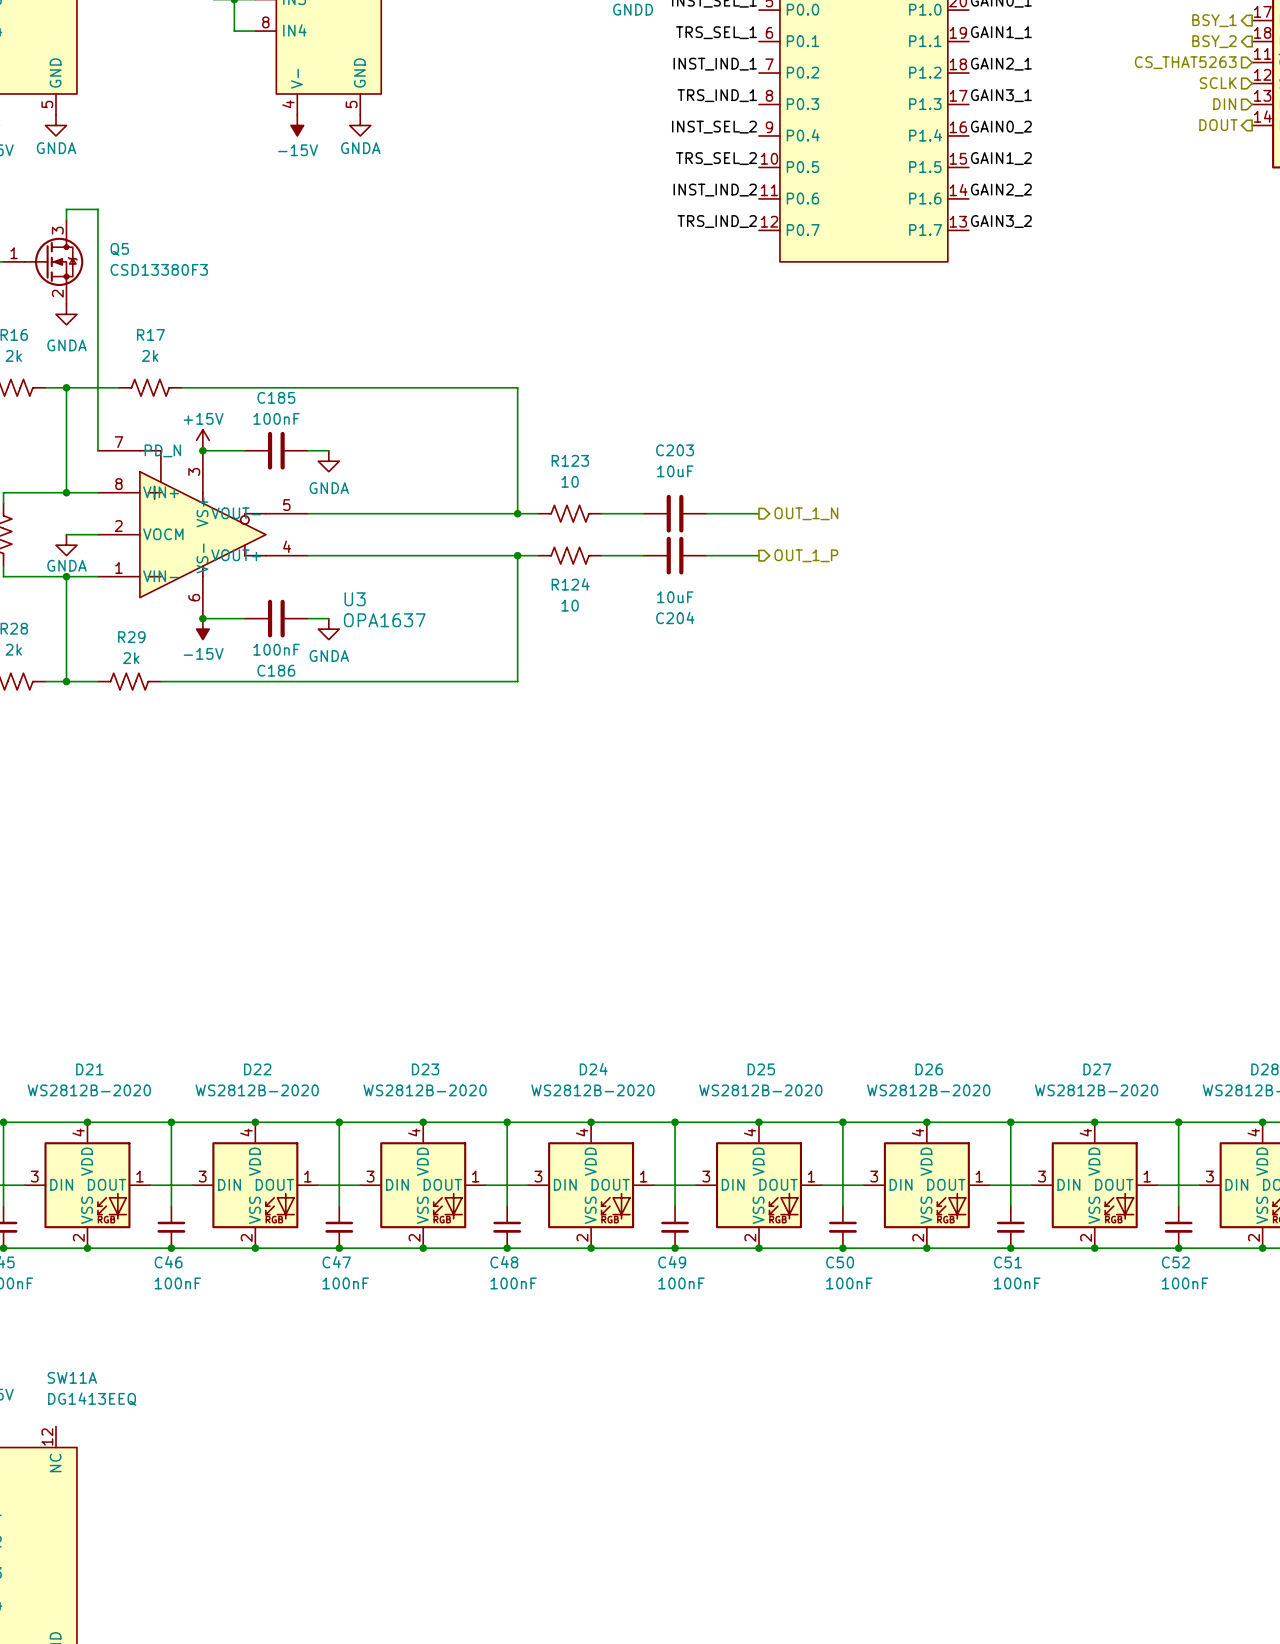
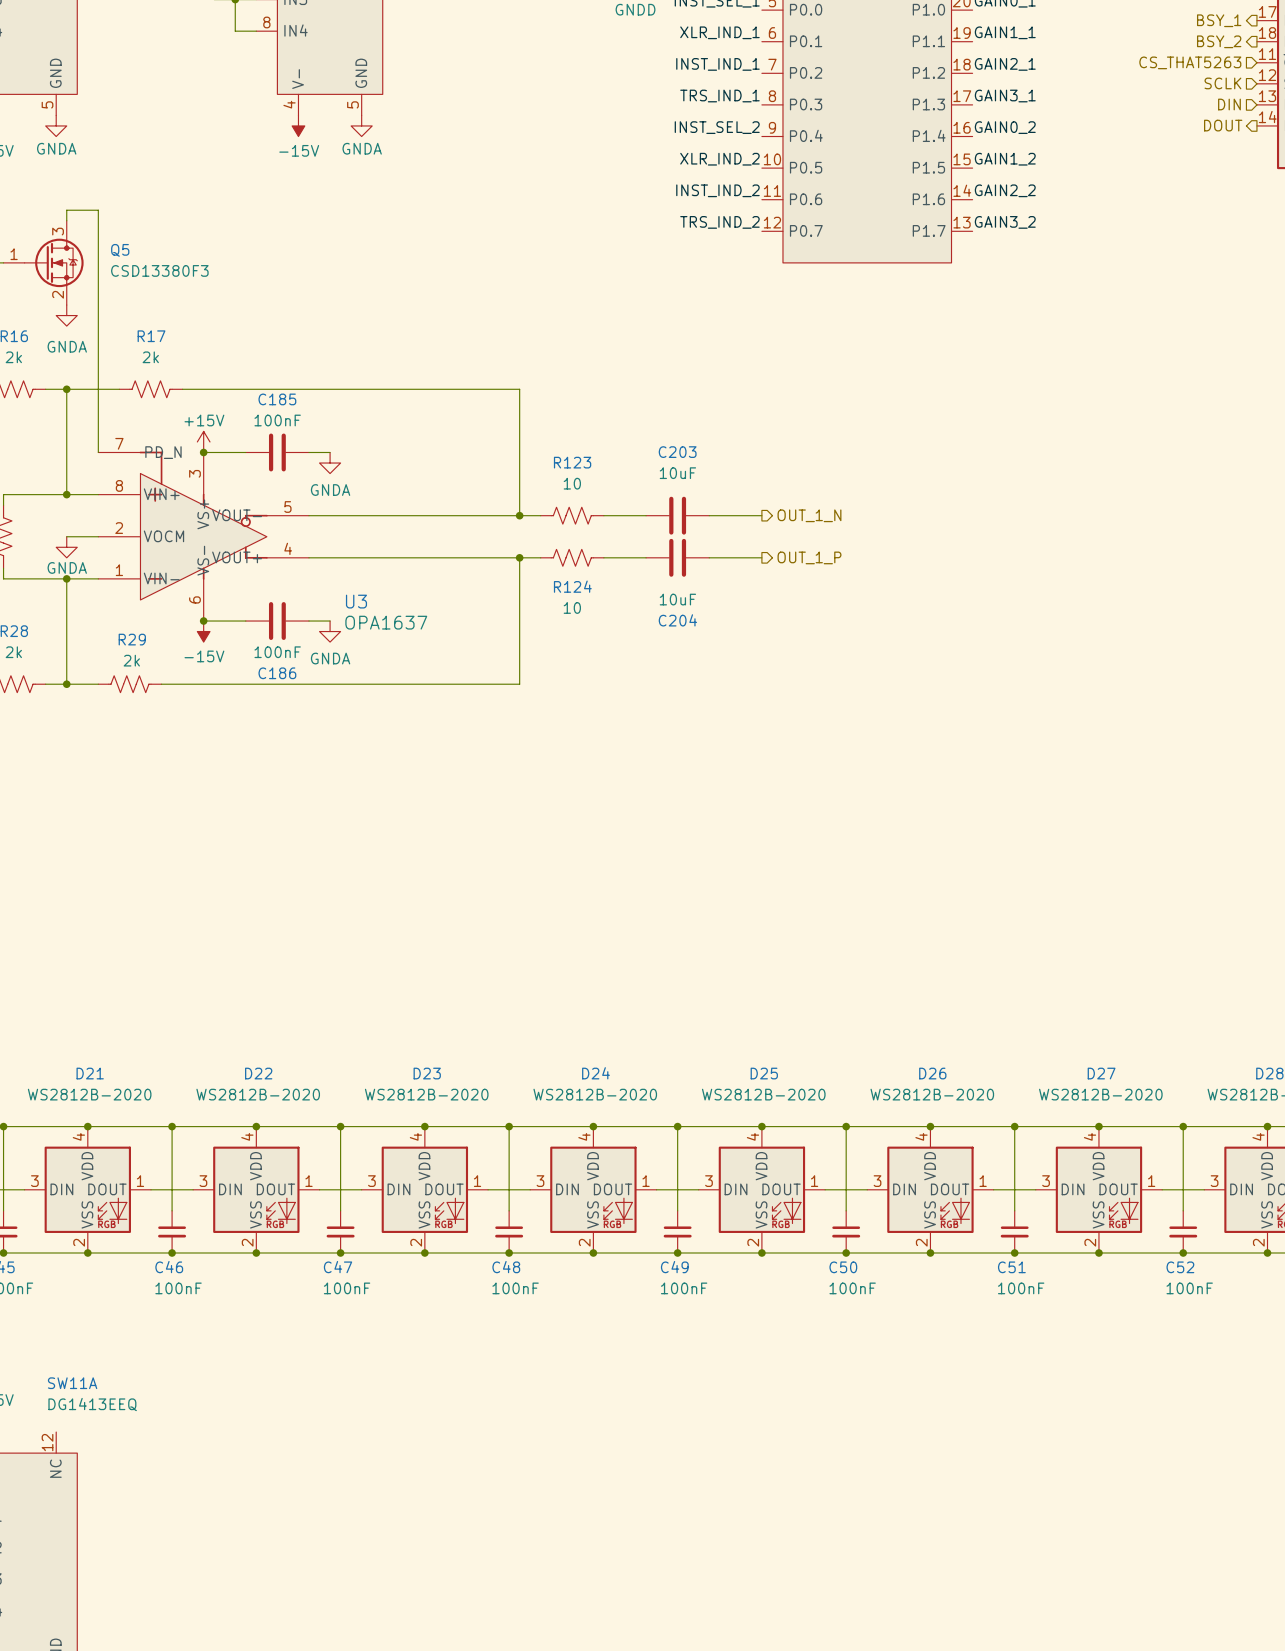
label: TRS_SEL_1 (716, 32) -> XLR_IND_1 (719, 32)
label: TRS_SEL_2 (716, 158) -> XLR_IND_2 (719, 159)

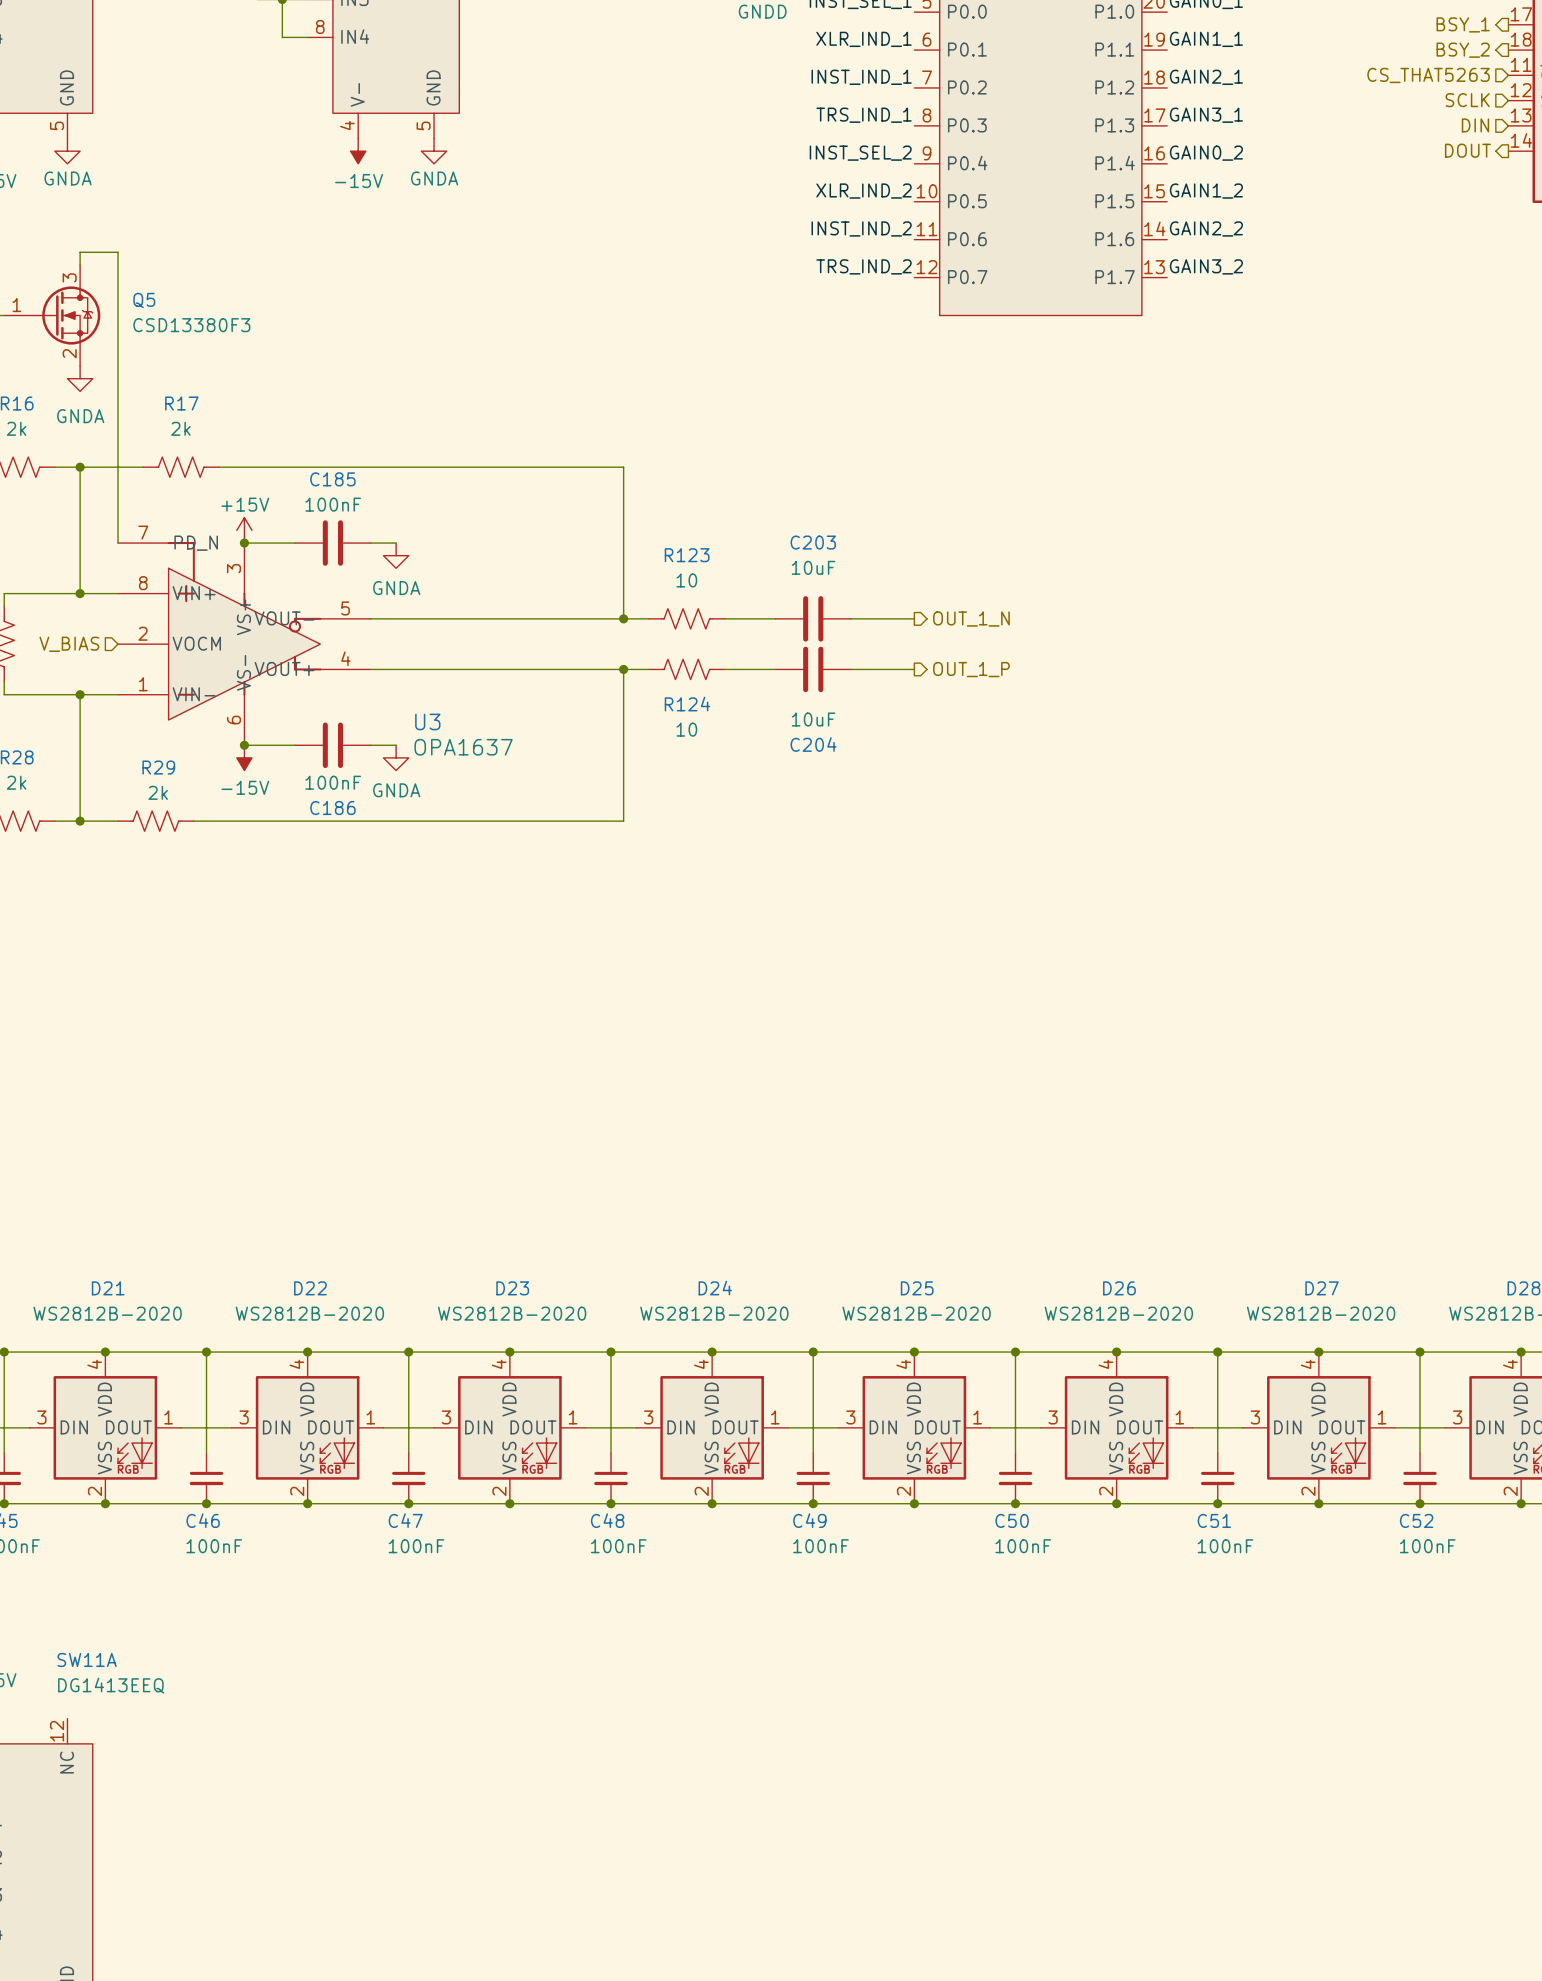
hierarchical label: none -> V_BIAS (69, 644)
wire: (66, 536) (98, 536) -> none
power symbol: GNDA (66, 547) -> none

